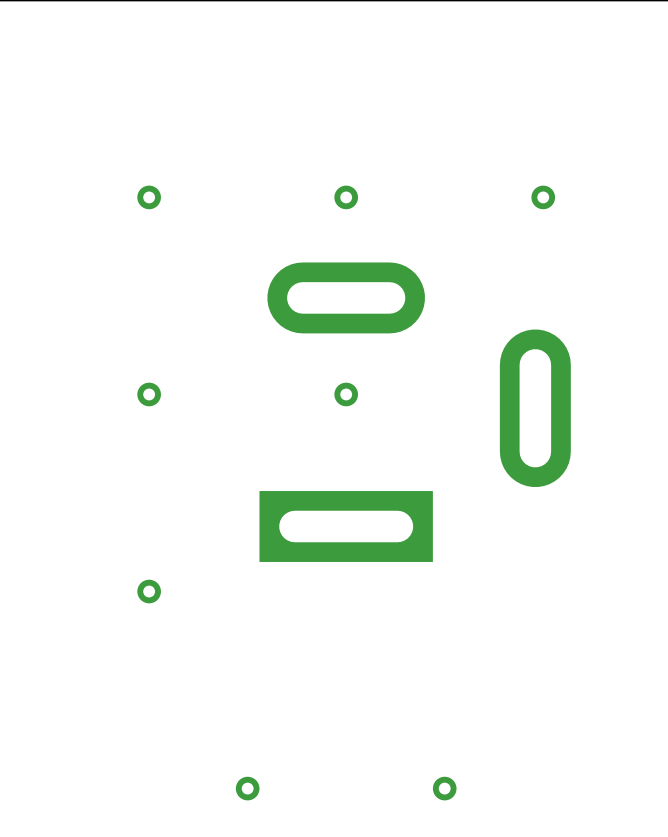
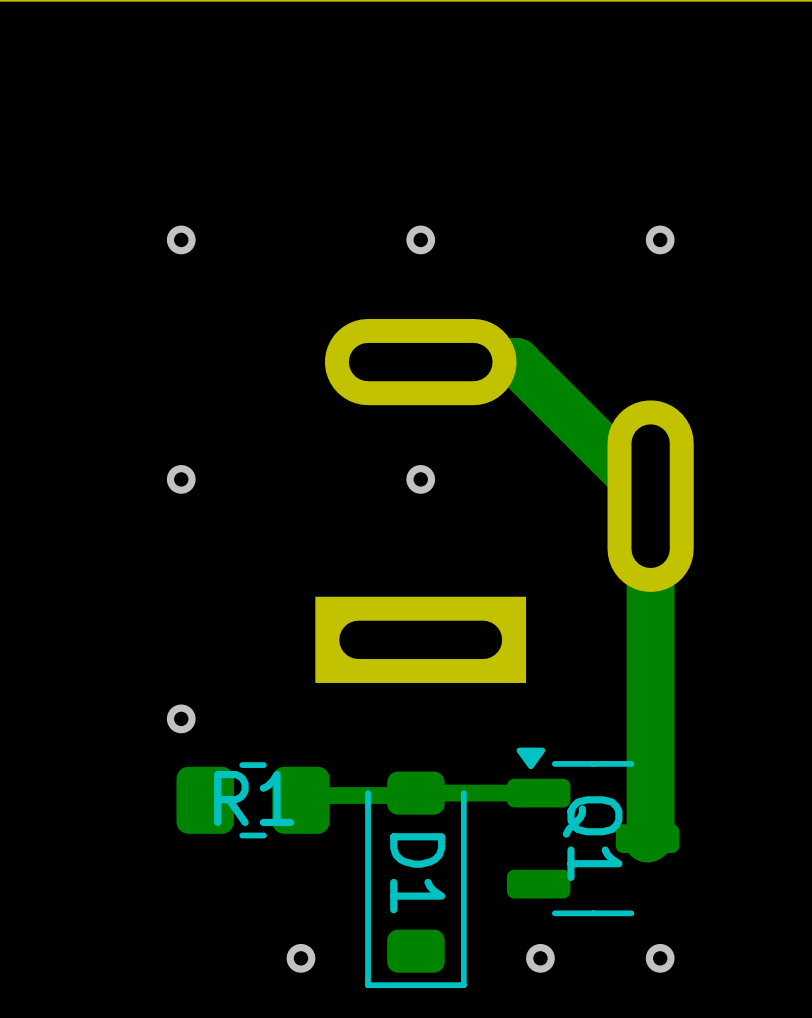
track: none -> (420, 362) (516, 362) (650, 496) (650, 835) (647, 838)
track: none -> (538, 793) (305, 795) (300, 800)
R1: none -> (253, 800)
Q1: none -> (593, 831)
D1: none -> (415, 879)
via: none -> (660, 958)

